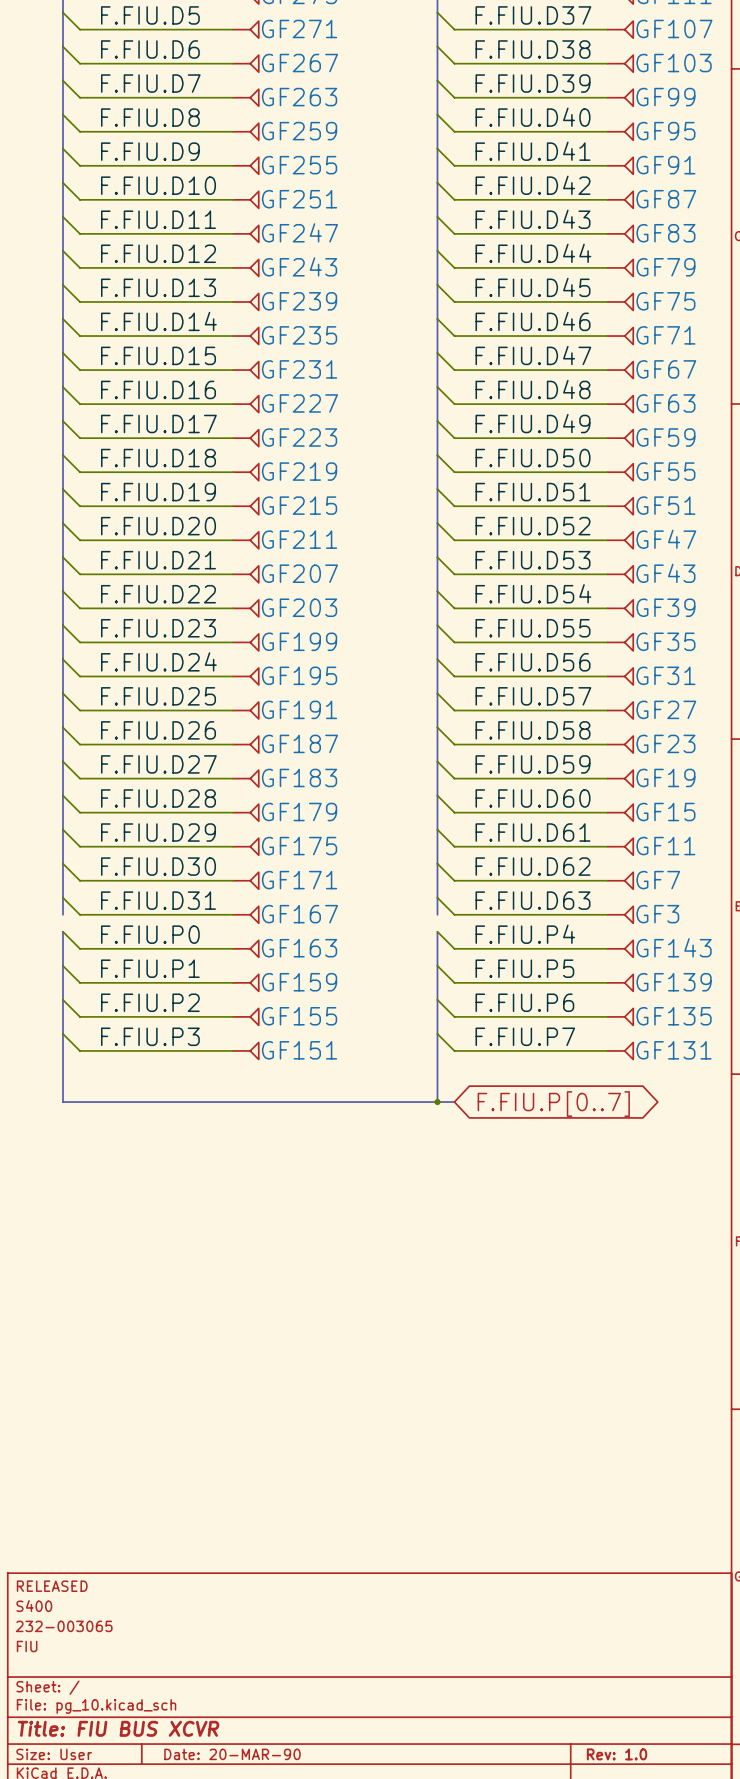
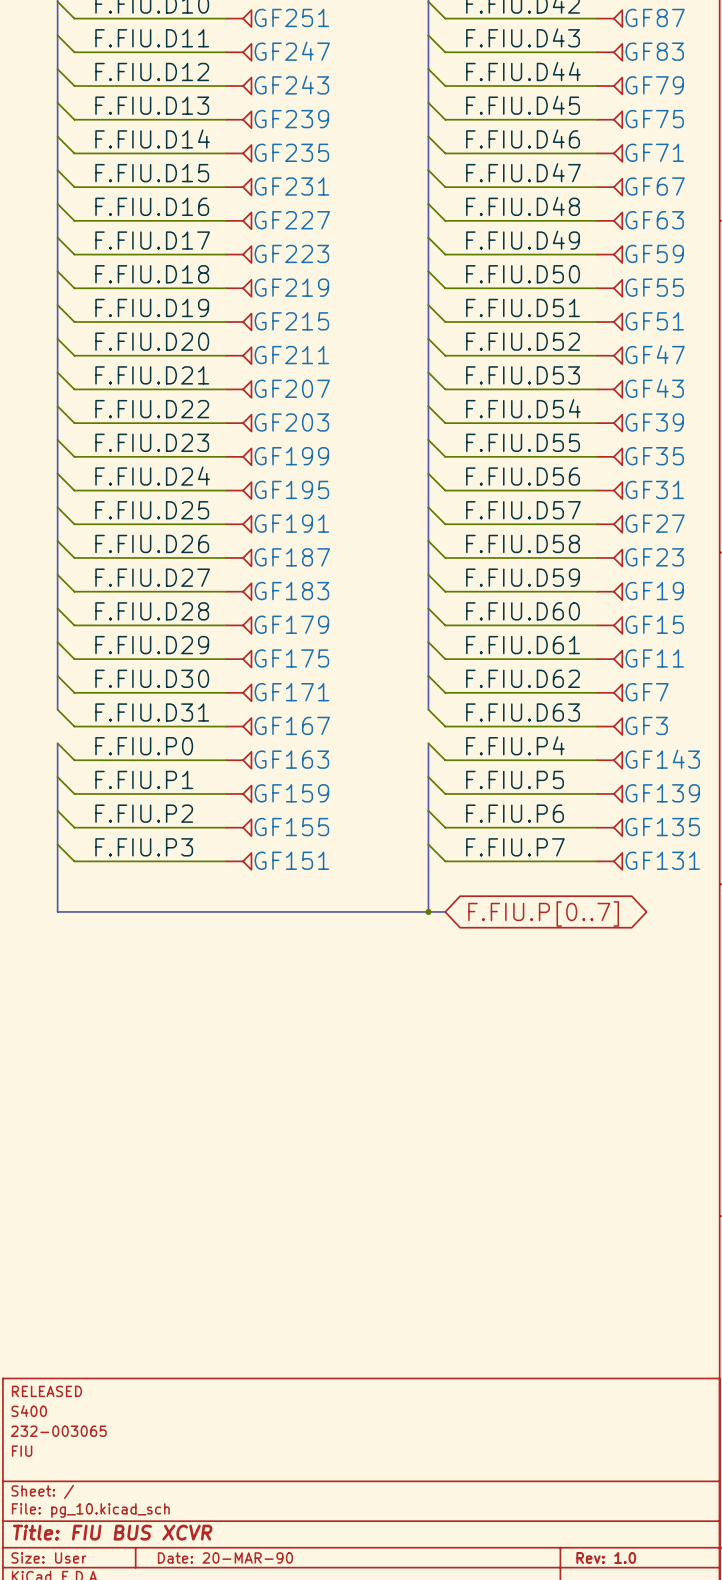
bus: (62, 897) (62, 914) -> none
bus: (437, 897) (437, 914) -> none

